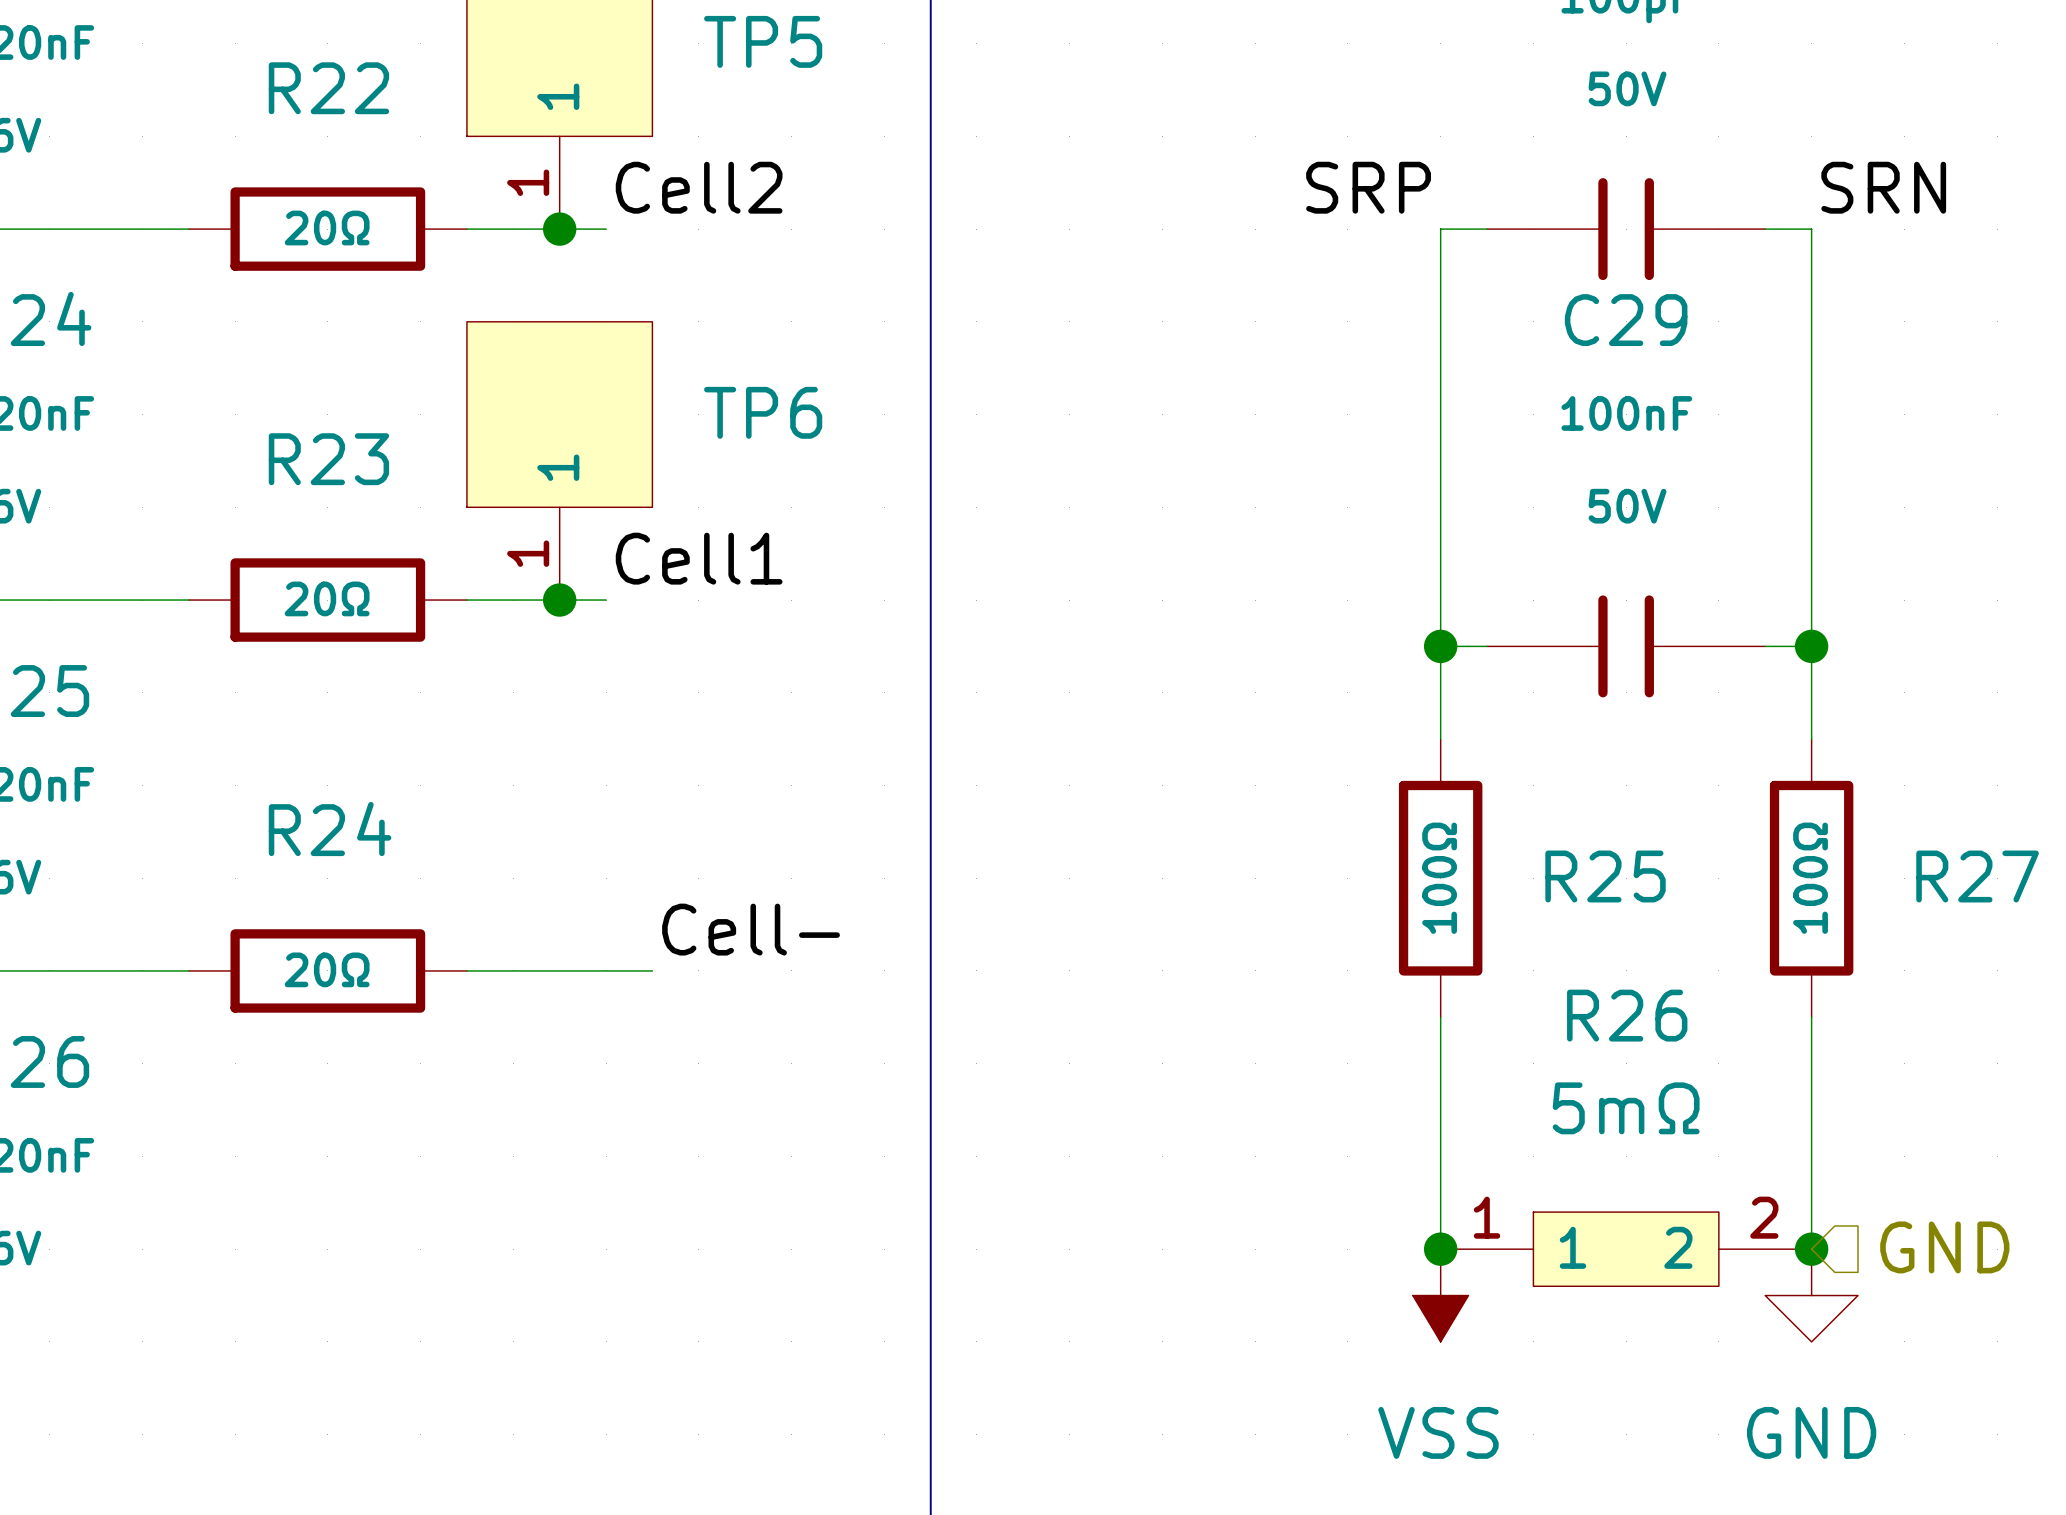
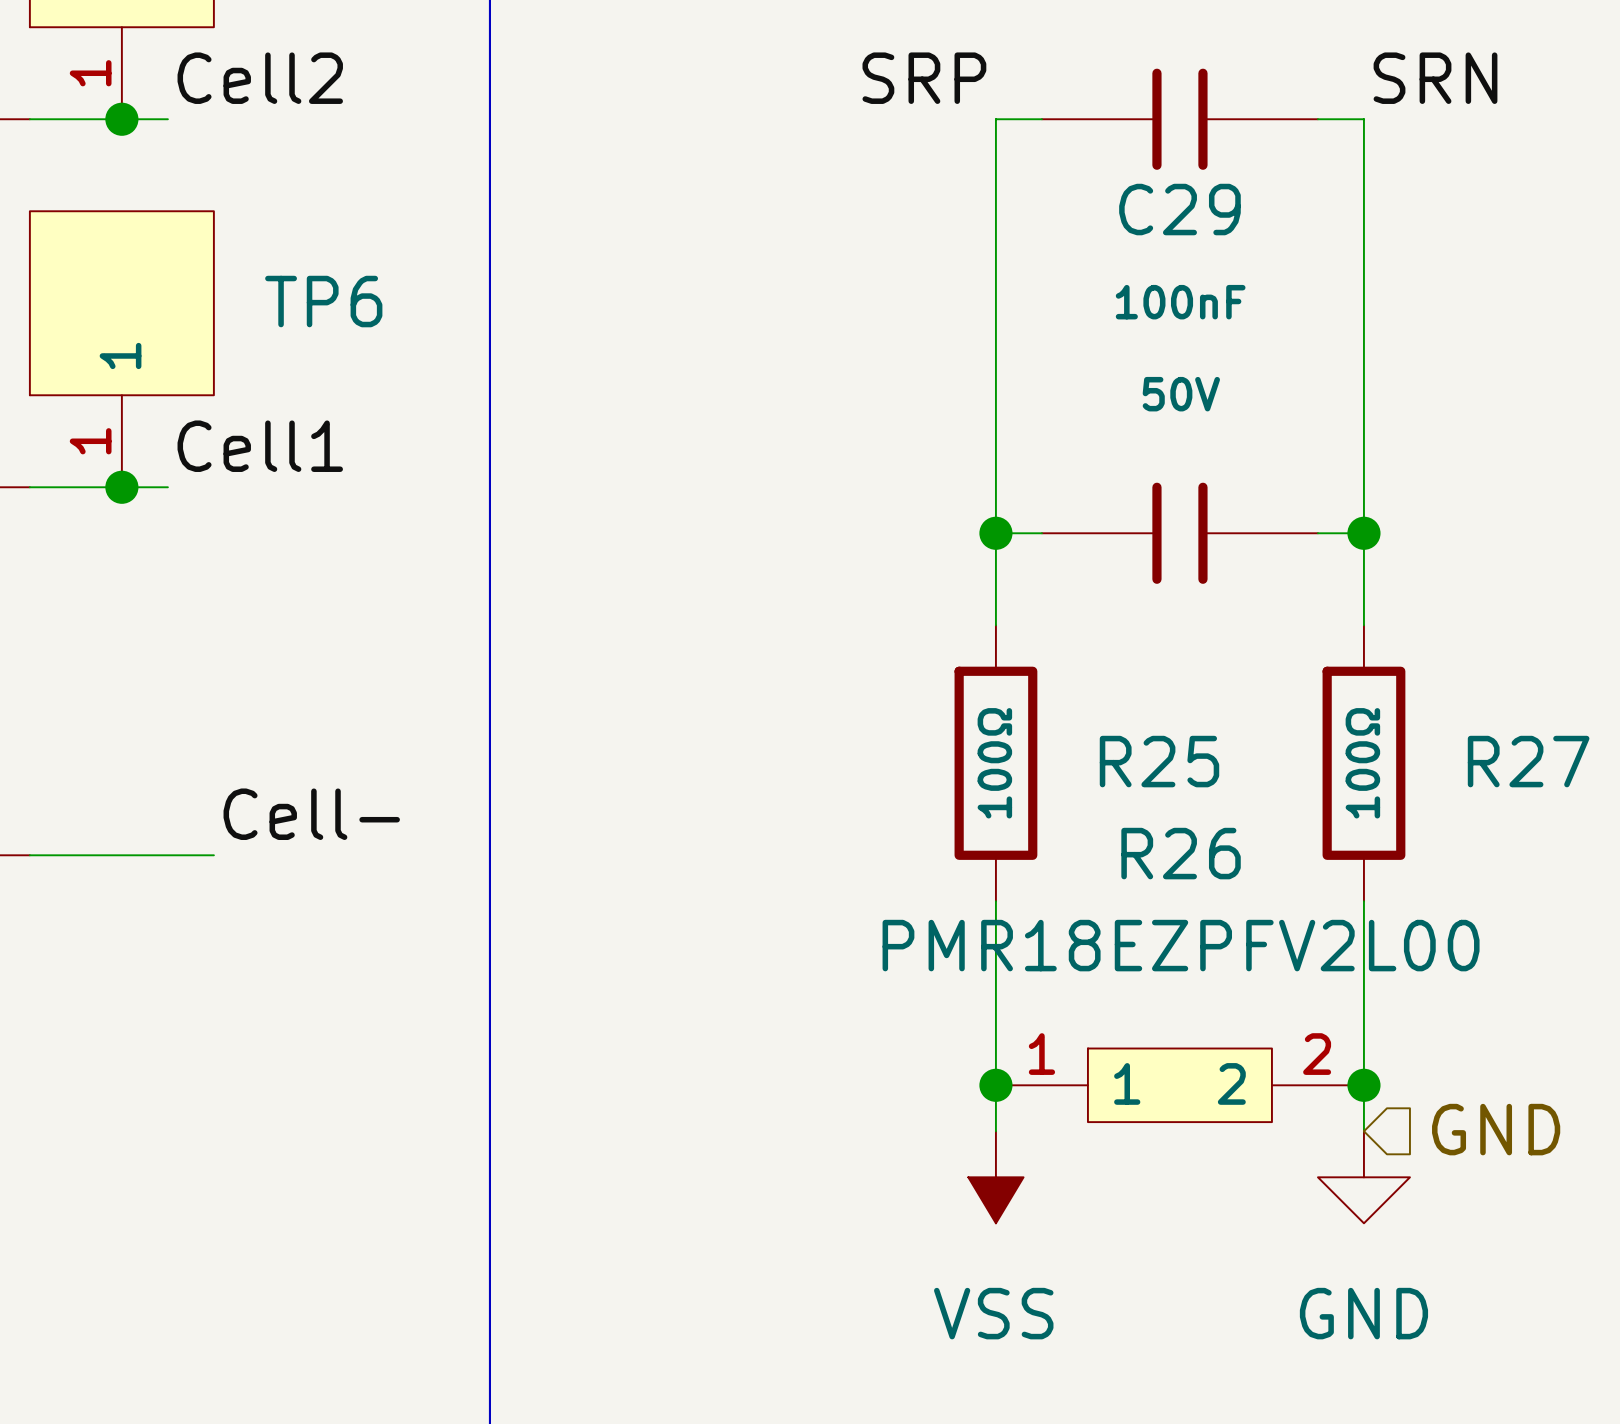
R26 value: 5mΩ (1626, 1108) -> PMR18EZPFV2L00 (1181, 945)
junction position: (1440, 1249) -> (995, 1085)
R26 position: (1626, 1249) -> (1179, 1085)
junction position: (1811, 1249) -> (1363, 1085)

